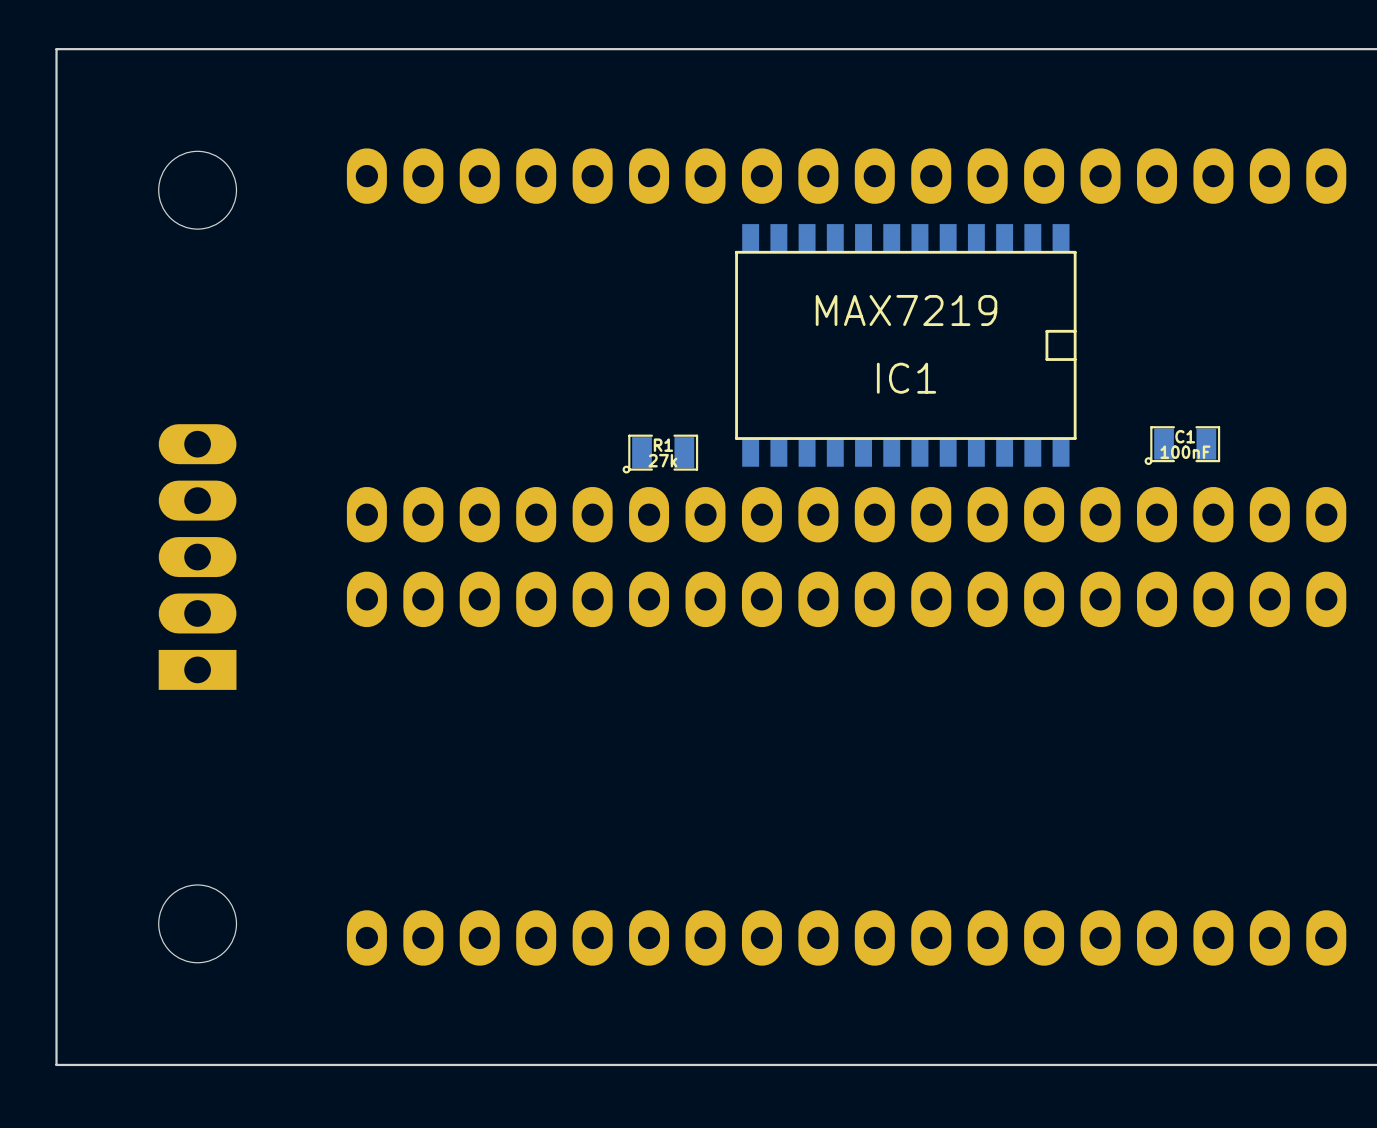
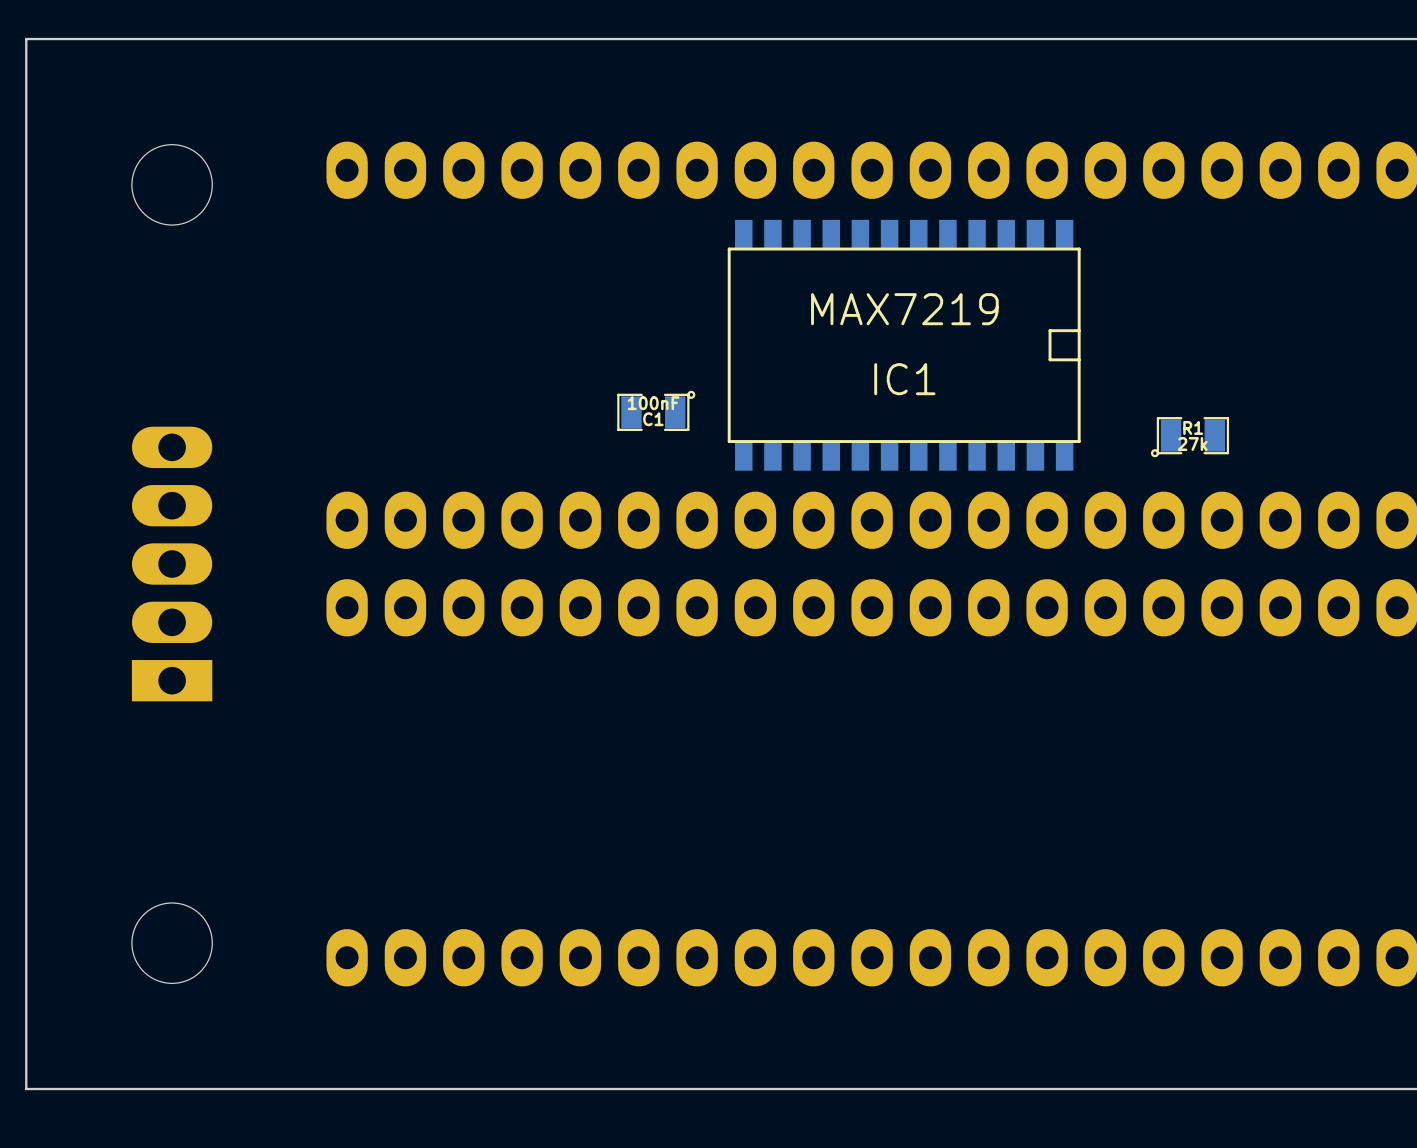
C1 rotation: 0° (1182, 445) -> 180° (656, 410)
C1 position: (1182, 445) -> (656, 410)
R1 position: (660, 454) -> (1190, 437)

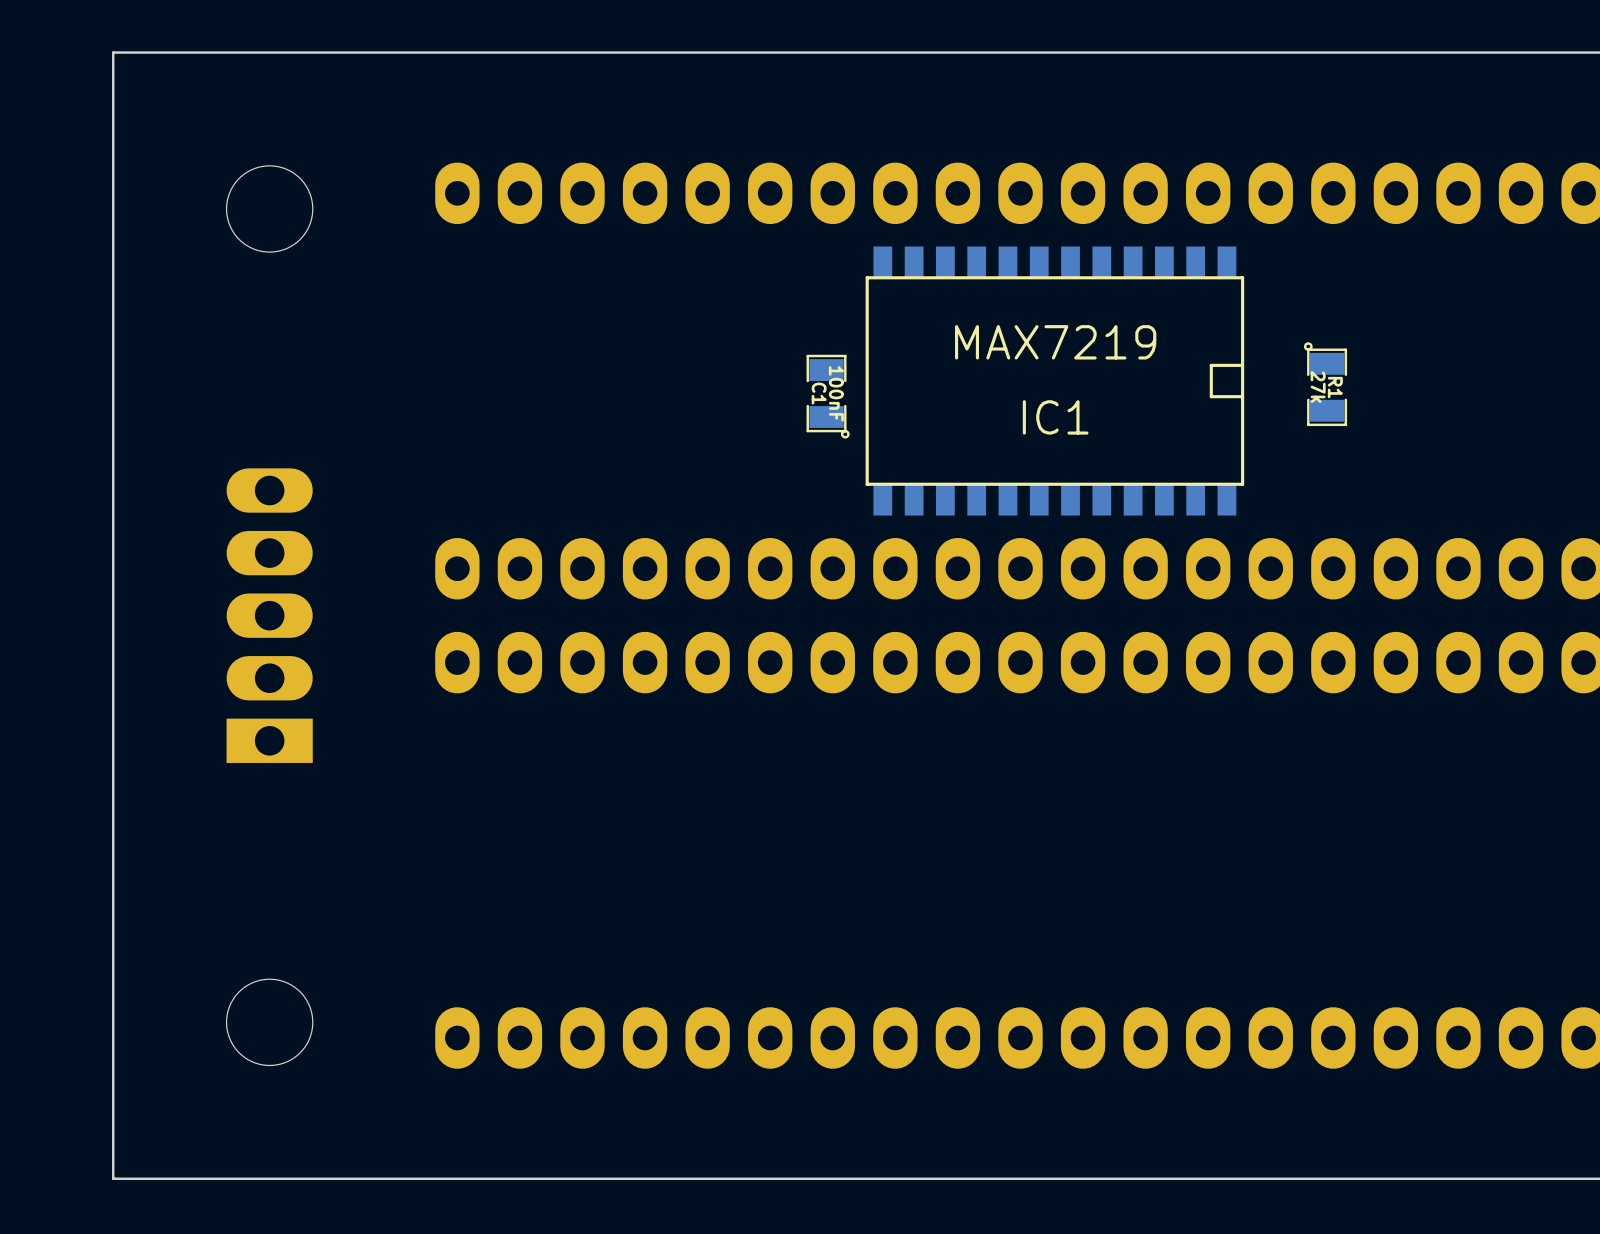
C1 rotation: 0° (656, 410) -> 90° clockwise (828, 396)
C1 position: (656, 410) -> (828, 396)
R1 rotation: 0° (1190, 437) -> 90° clockwise (1325, 384)
R1 position: (1190, 437) -> (1325, 384)

